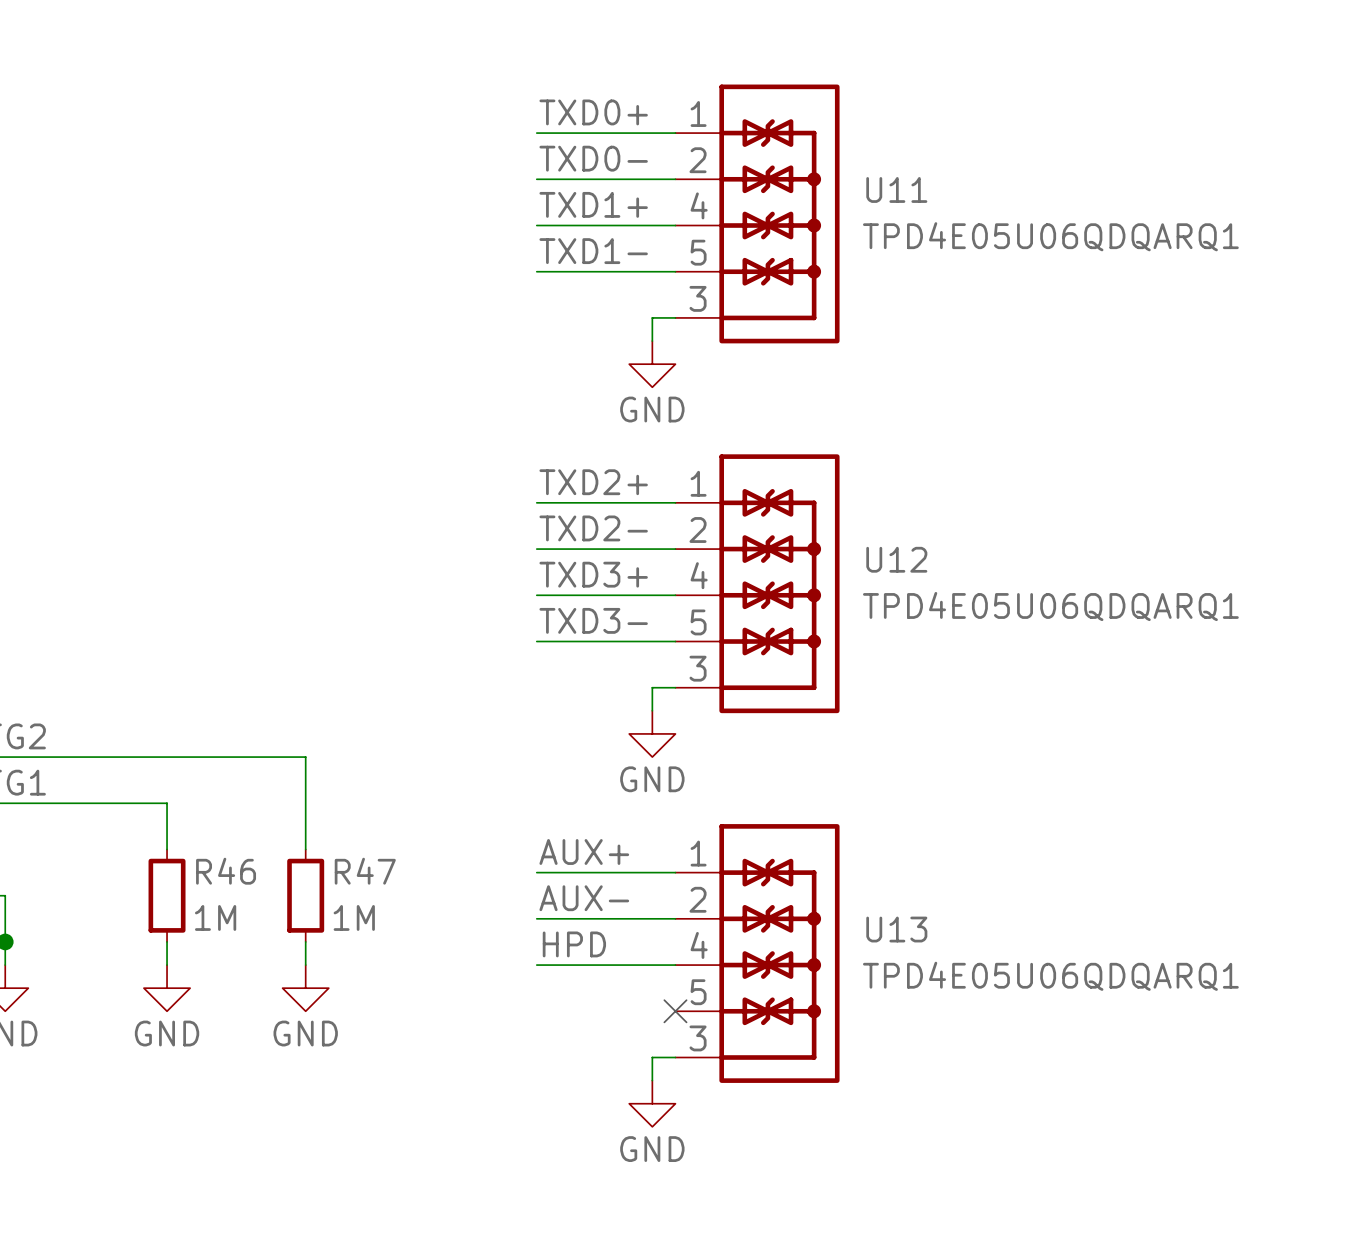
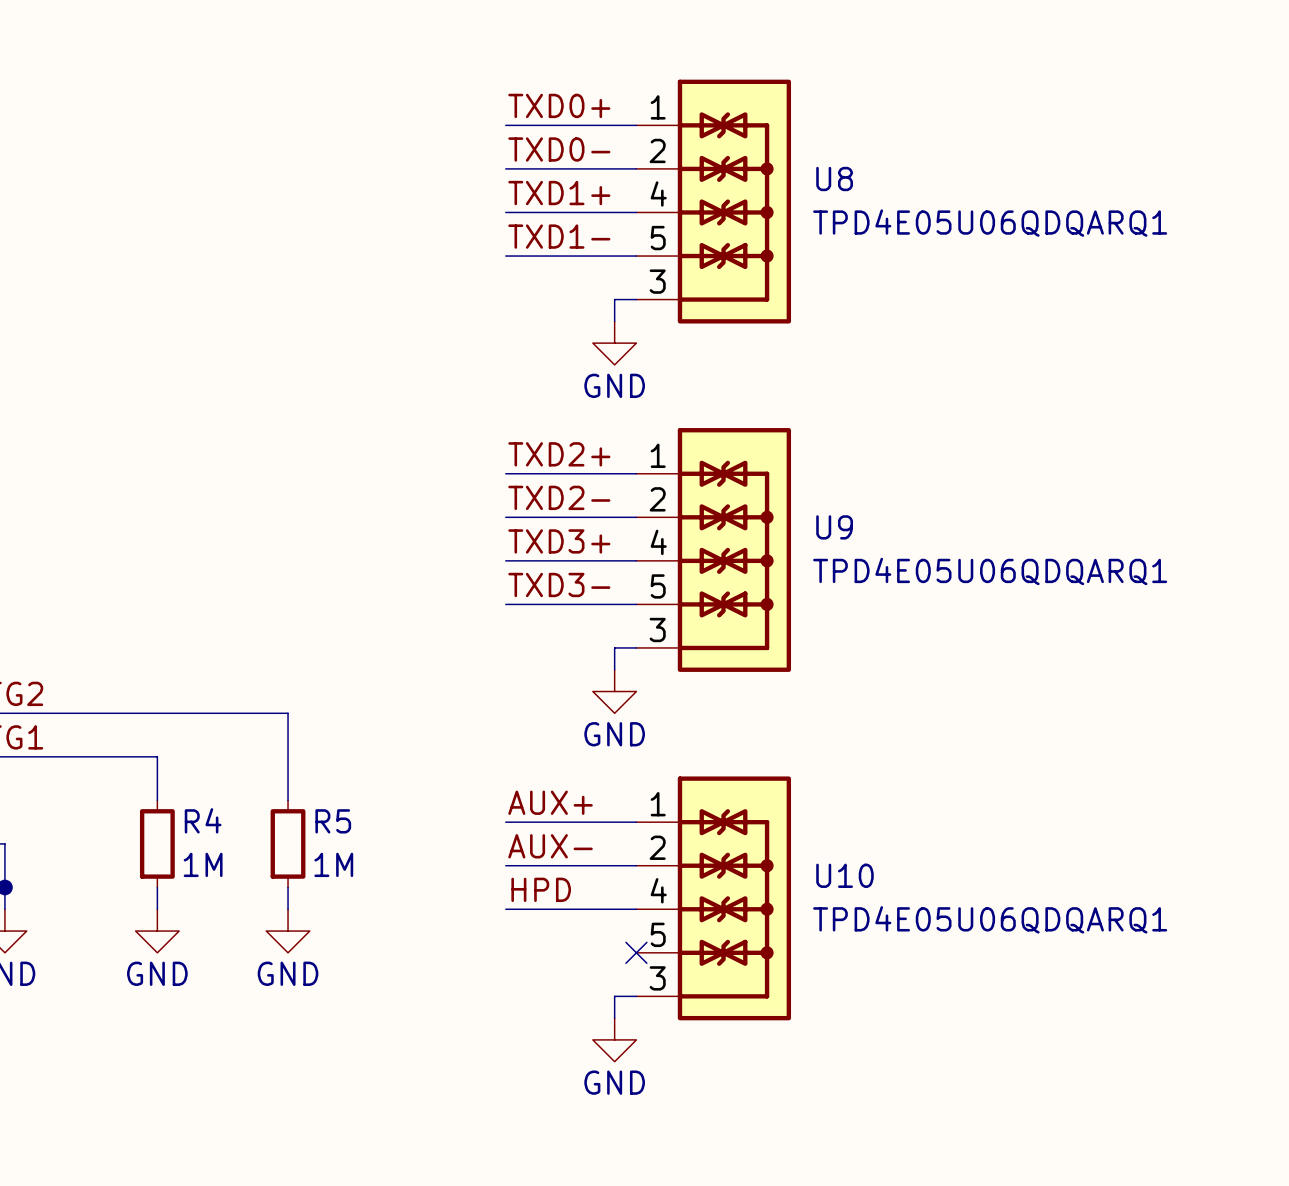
U11 name: U11 (896, 189) -> U8 (834, 178)
U12 name: U12 (896, 559) -> U9 (834, 527)
R46 name: R46 (226, 871) -> R4 (203, 820)
R47 name: R47 (365, 871) -> R5 (333, 821)
U13 name: U13 (896, 929) -> U10 (844, 875)

